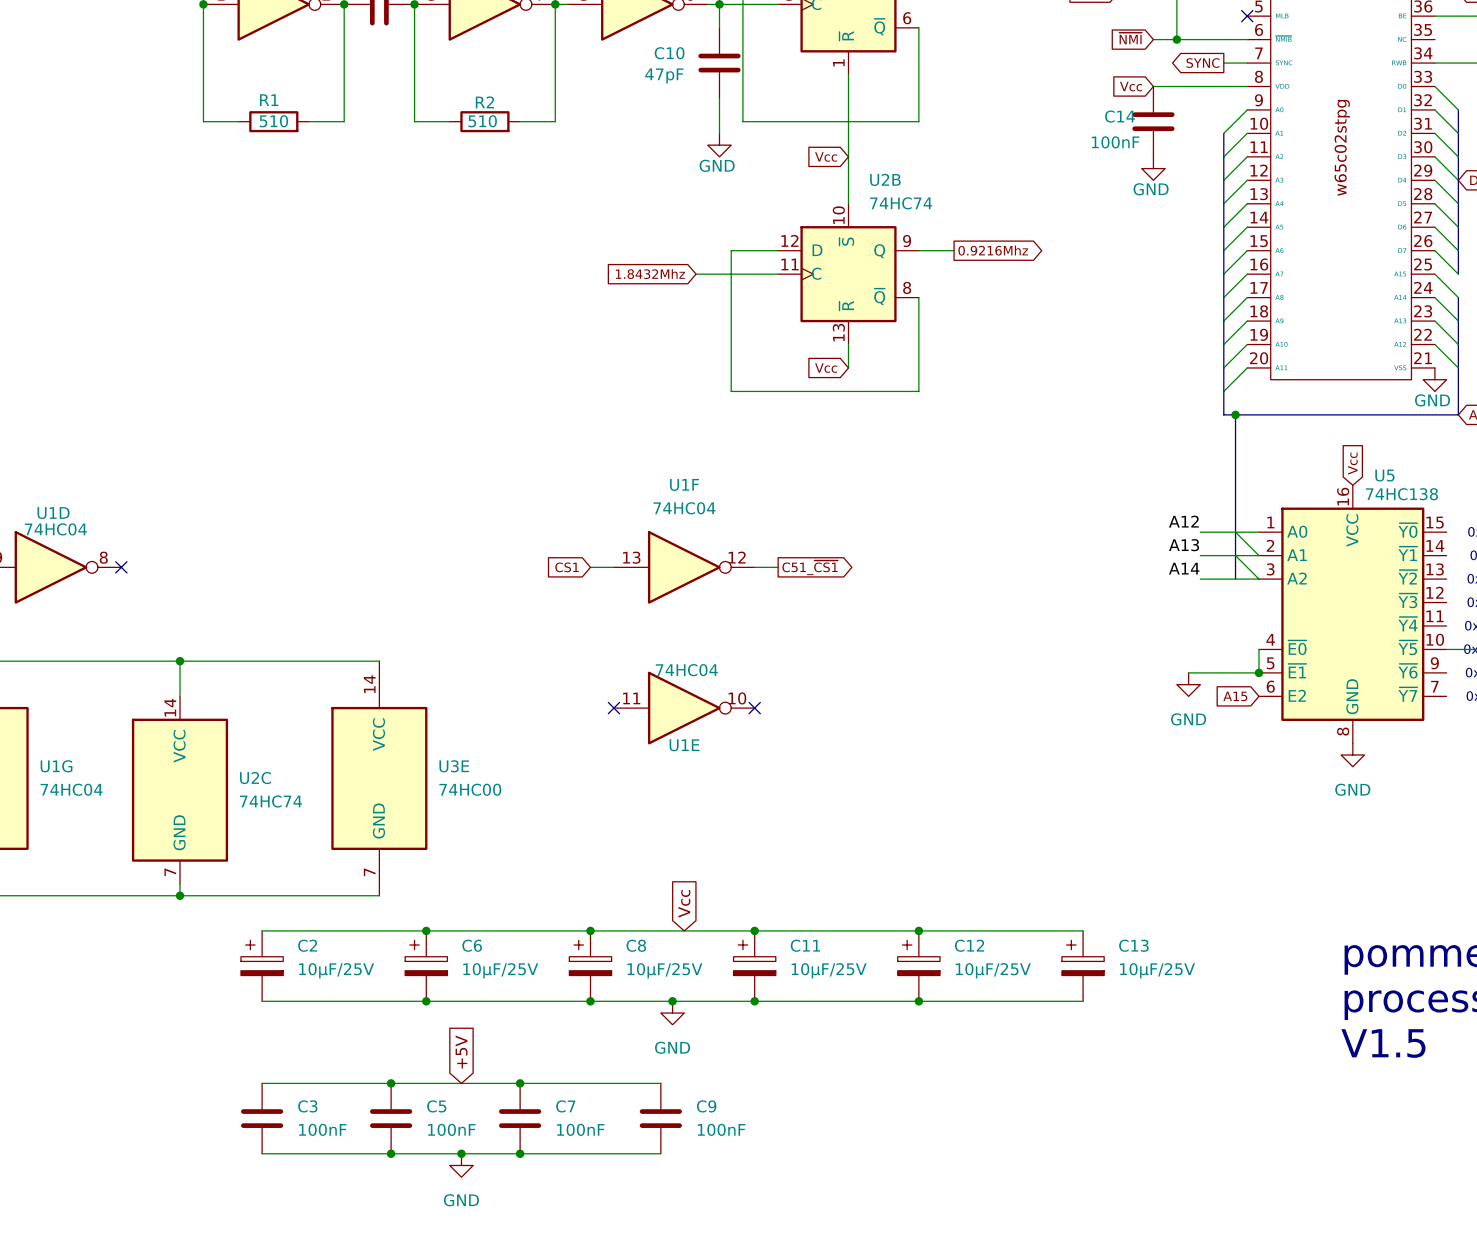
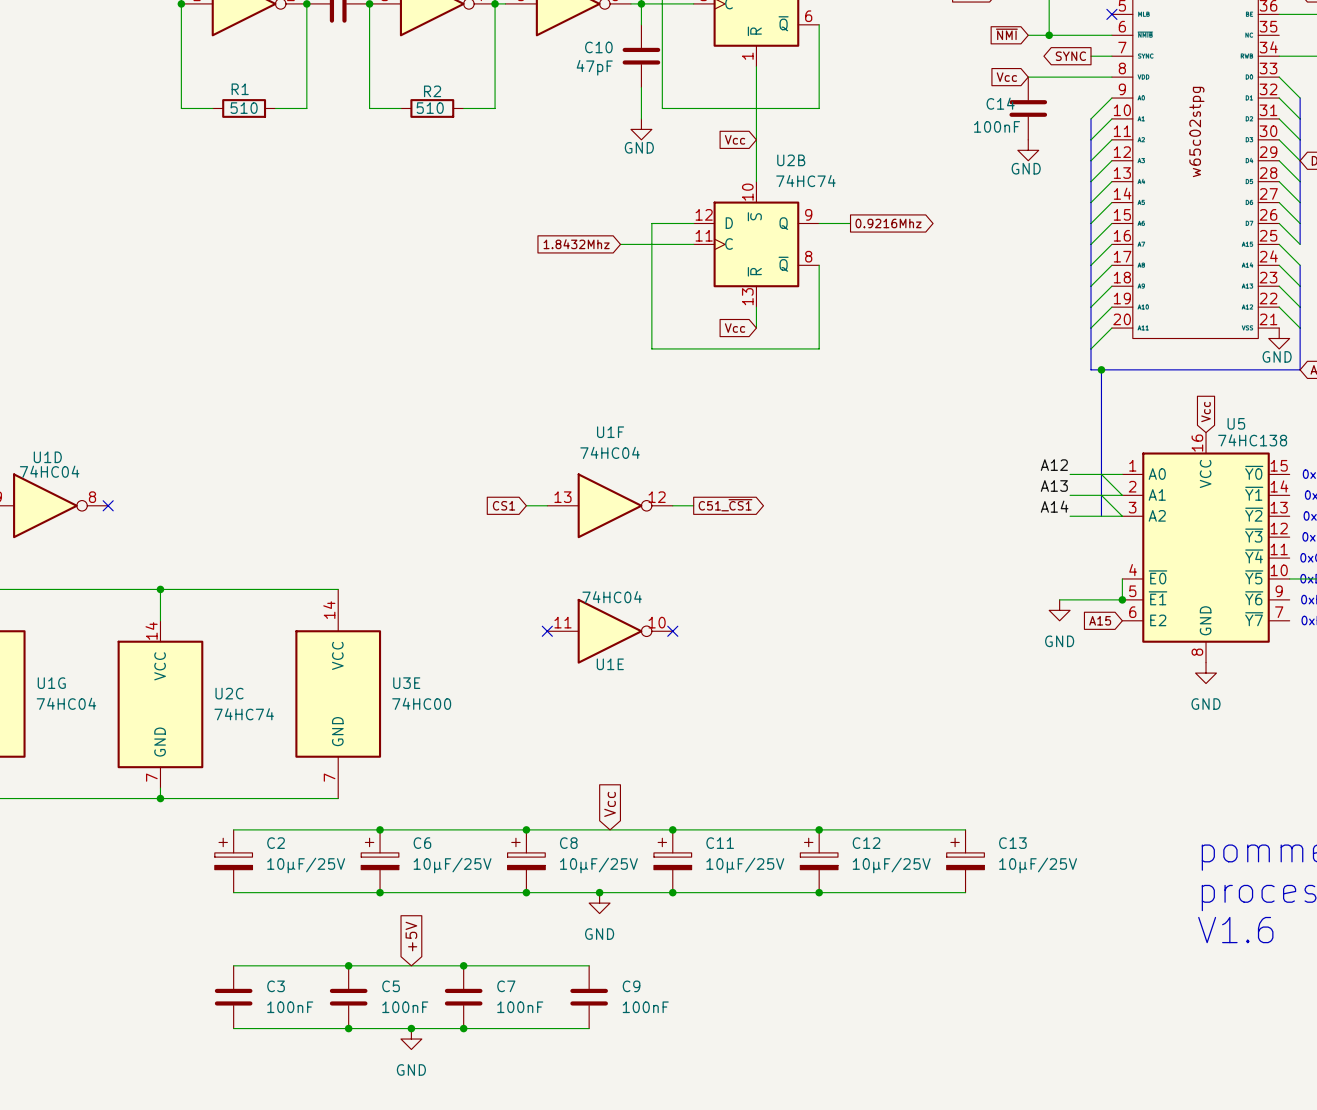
text: V1.5 (1383, 1043) -> V1.6 (1235, 930)

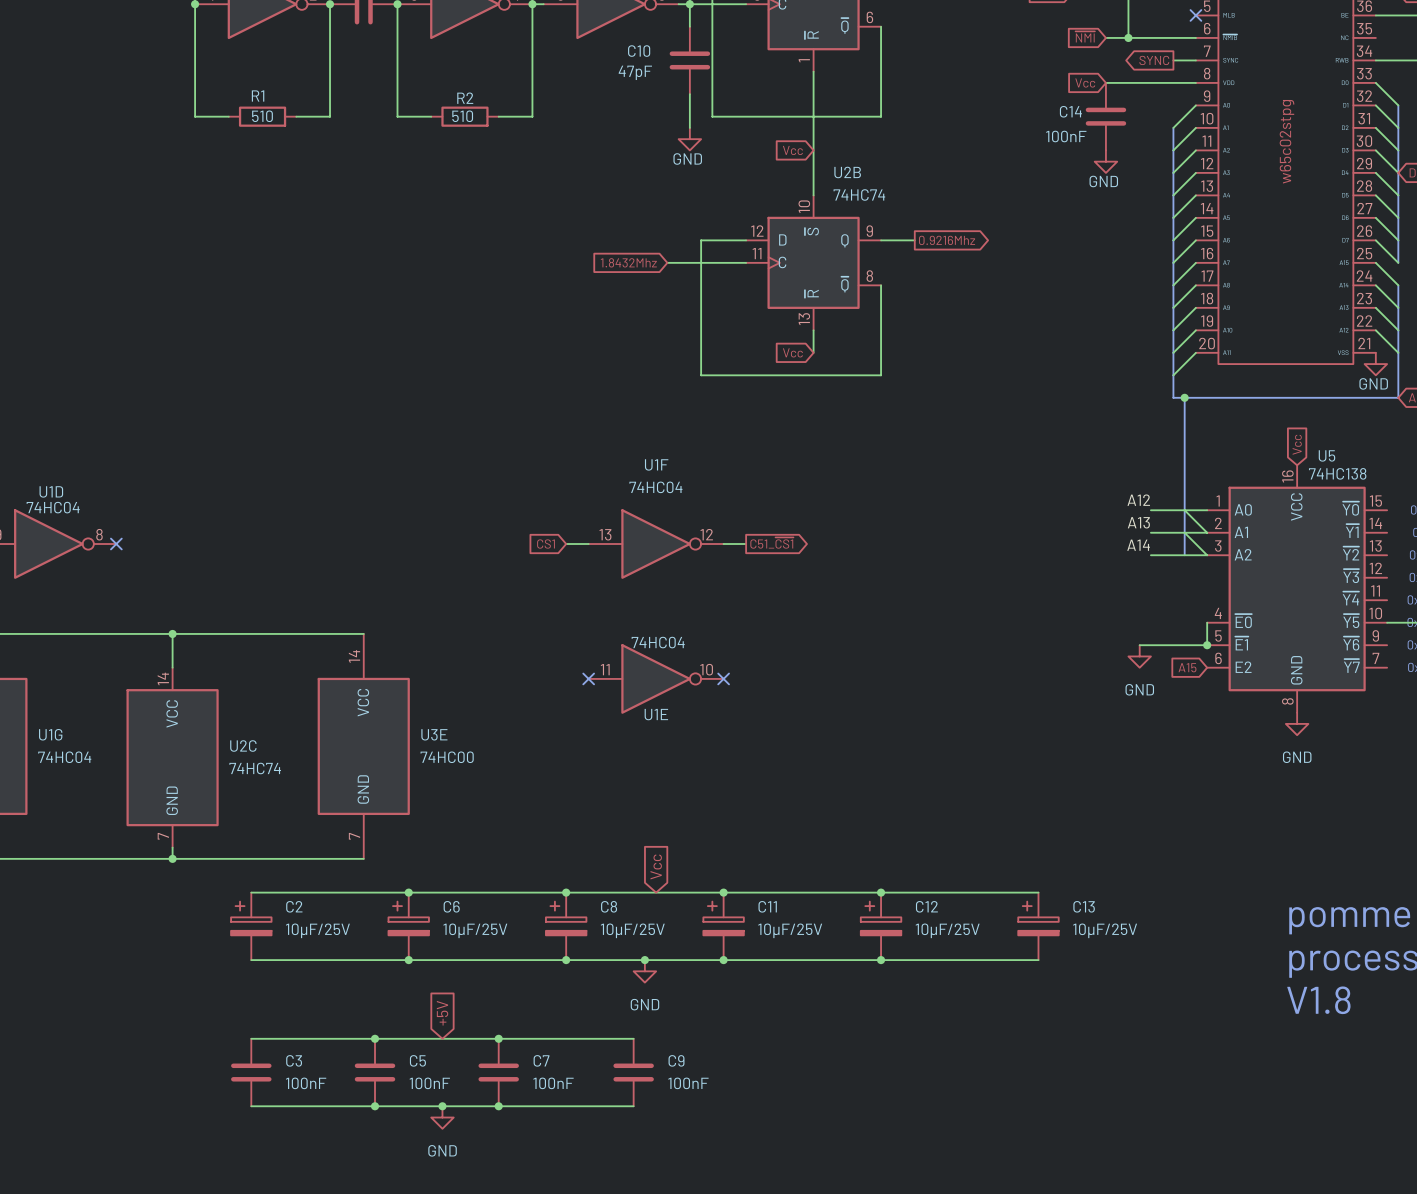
text: V1.6 (1235, 930) -> V1.8 (1318, 1000)

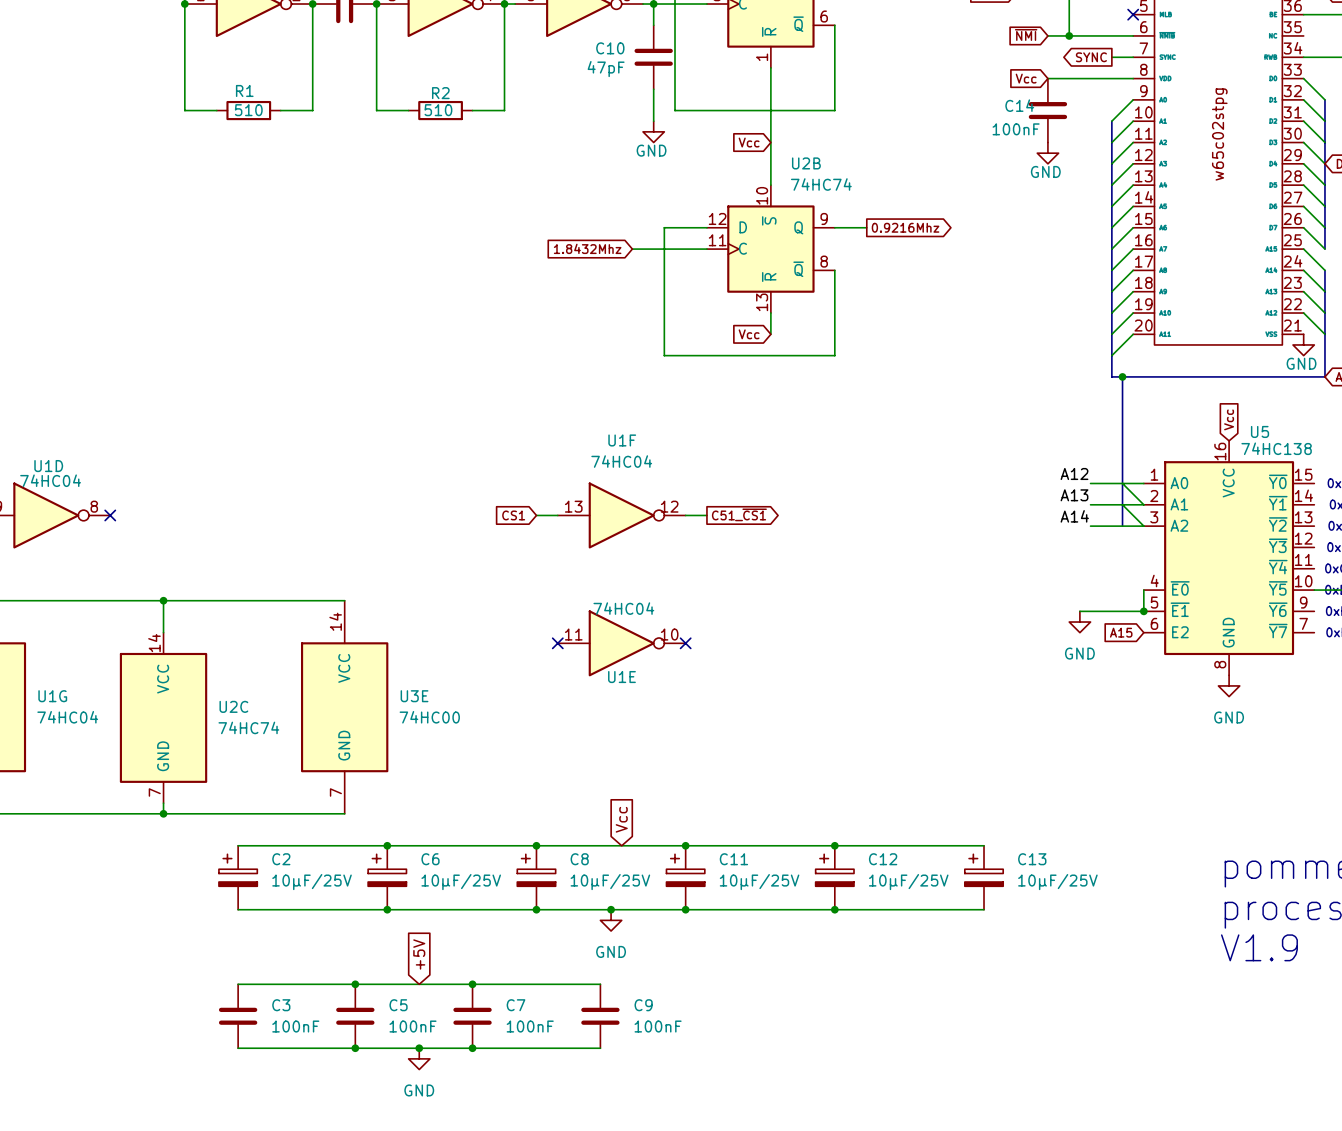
text: V1.8 (1318, 1000) -> V1.9 (1259, 947)

